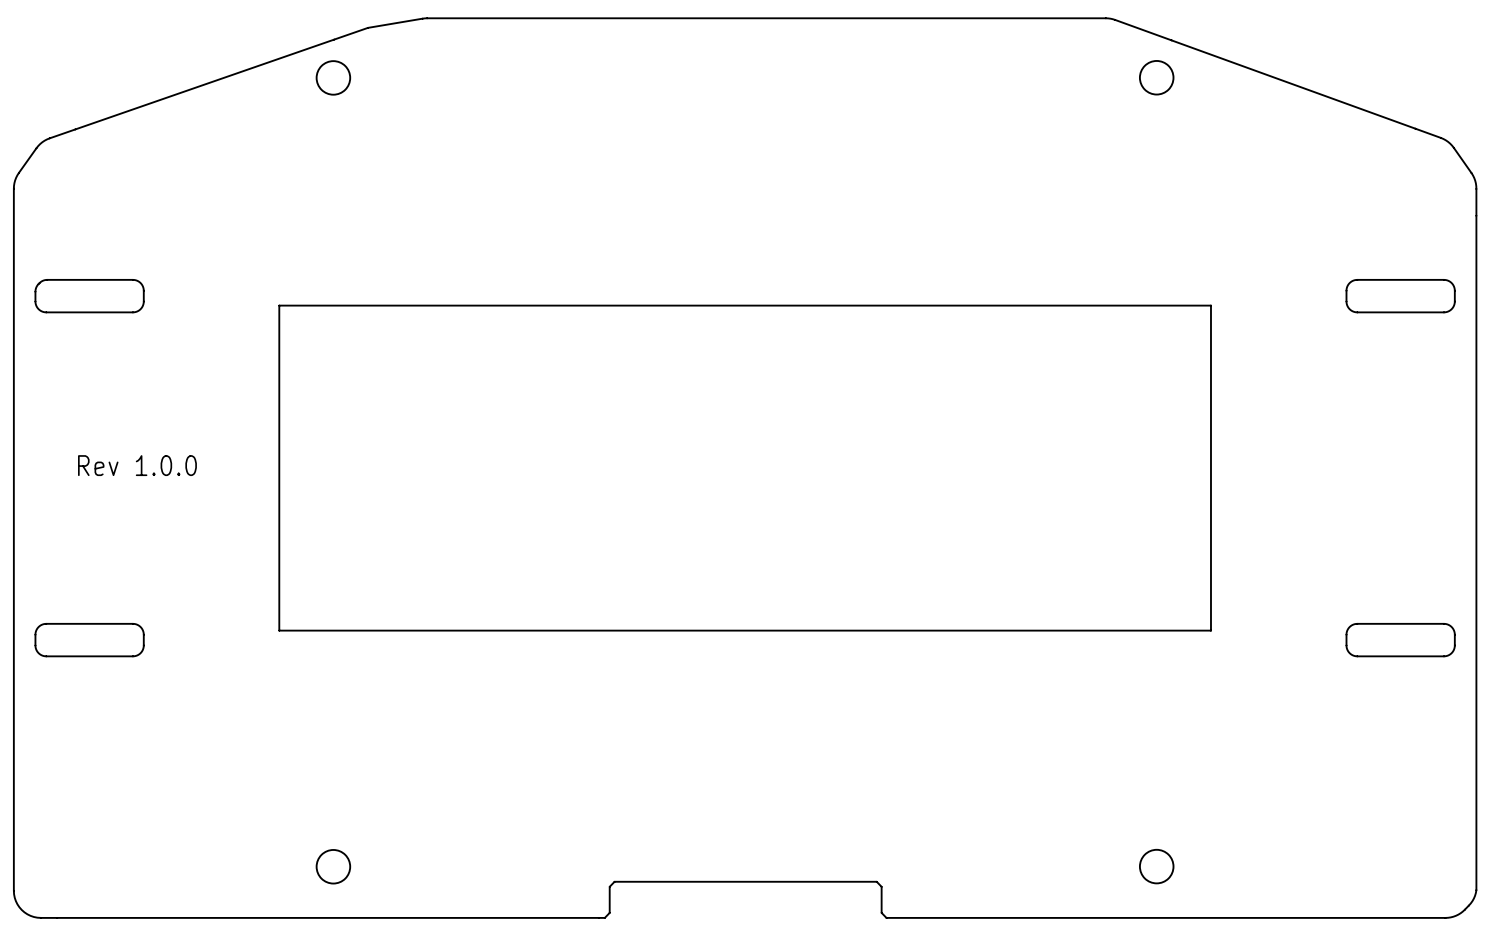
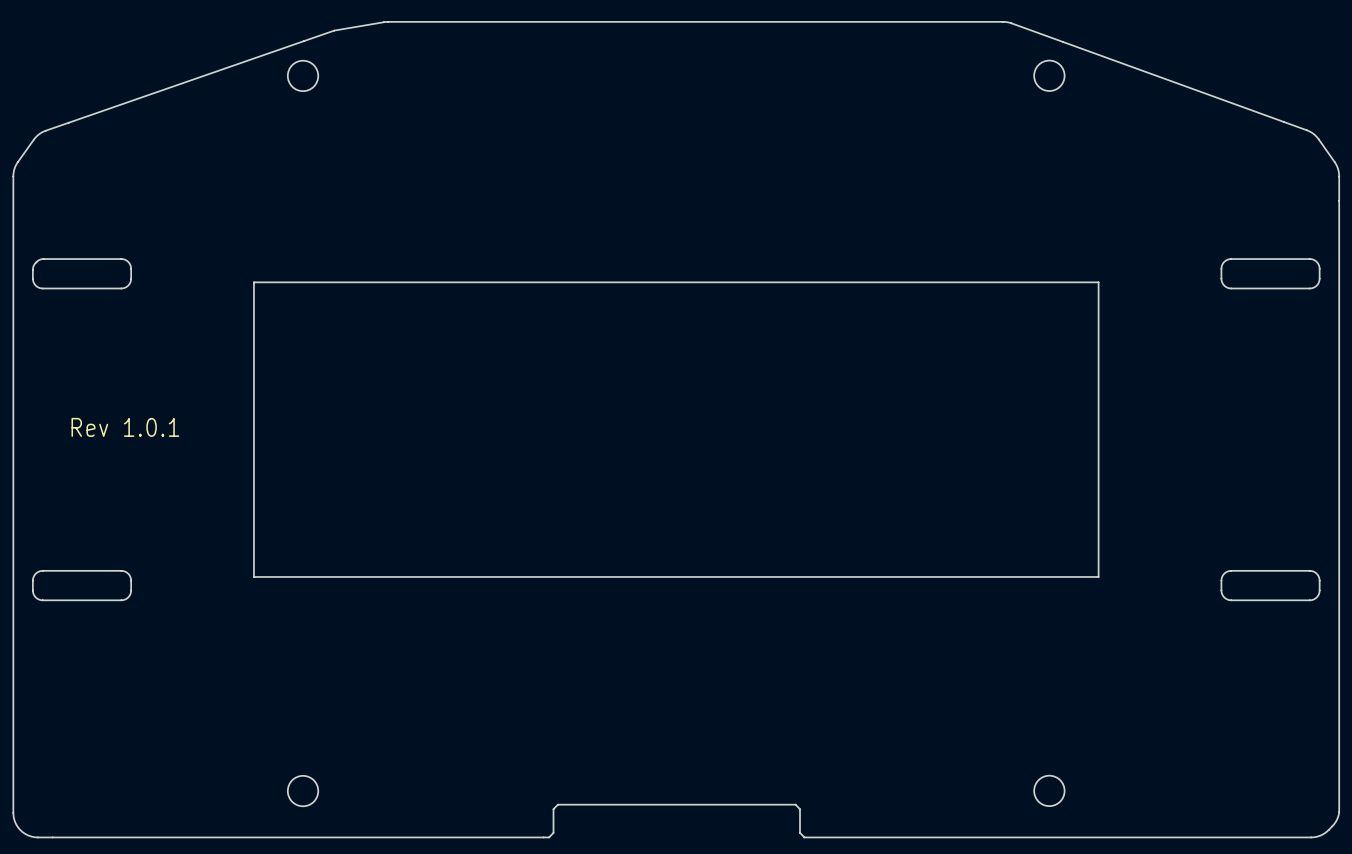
text: Rev 1.0.0 (137, 465) -> Rev 1.0.1 (125, 427)

